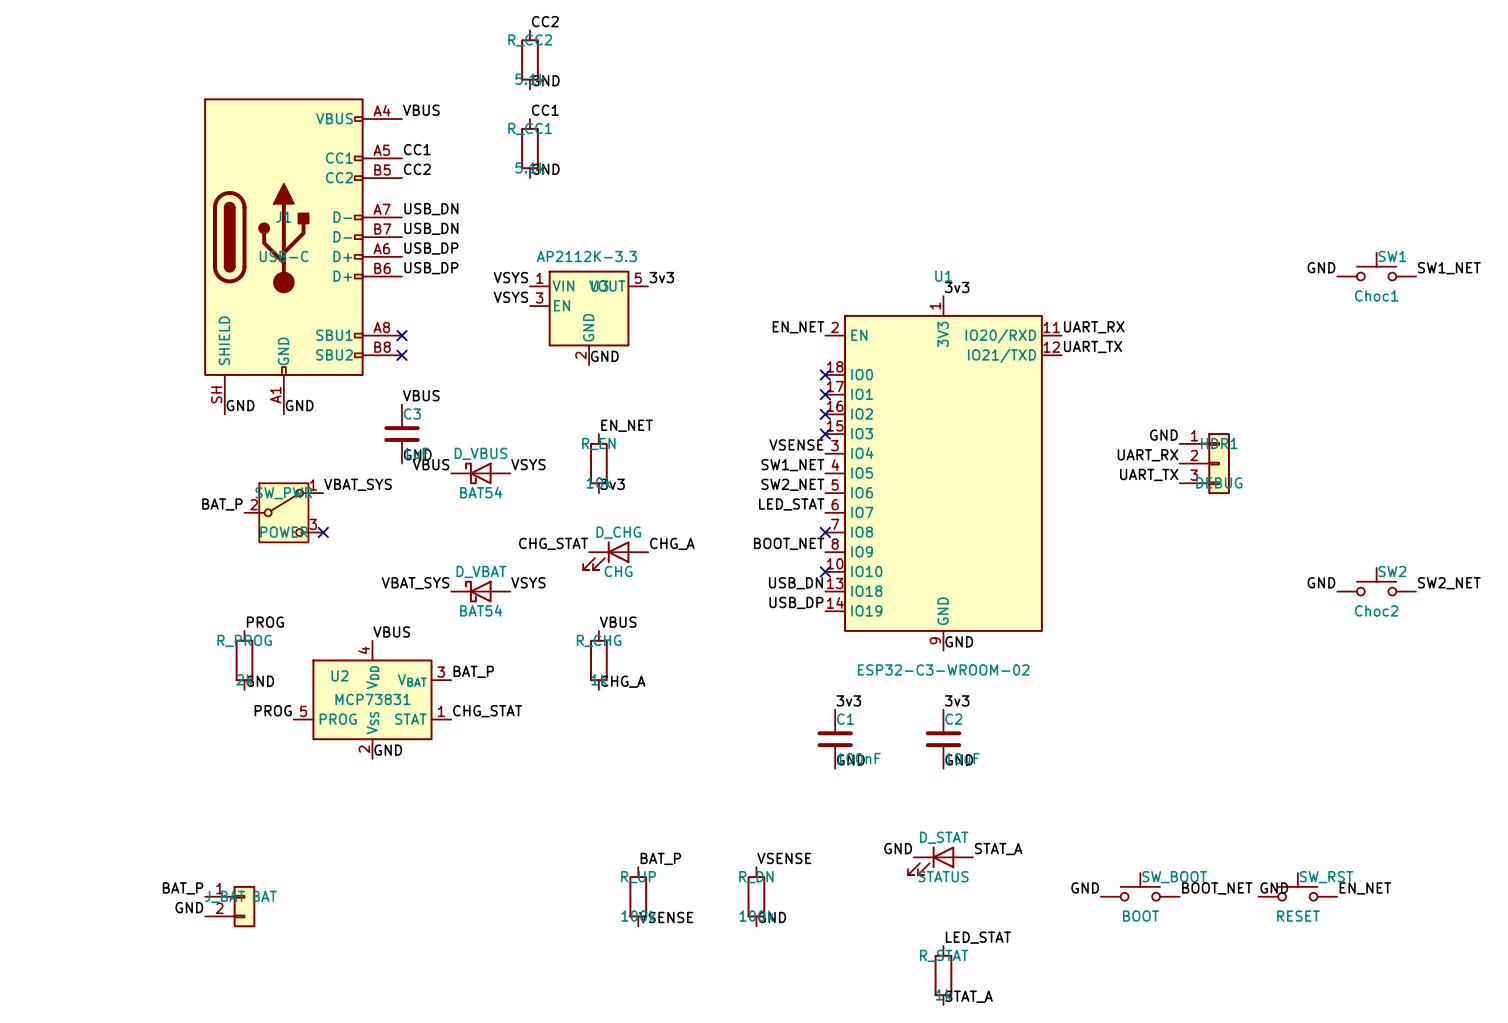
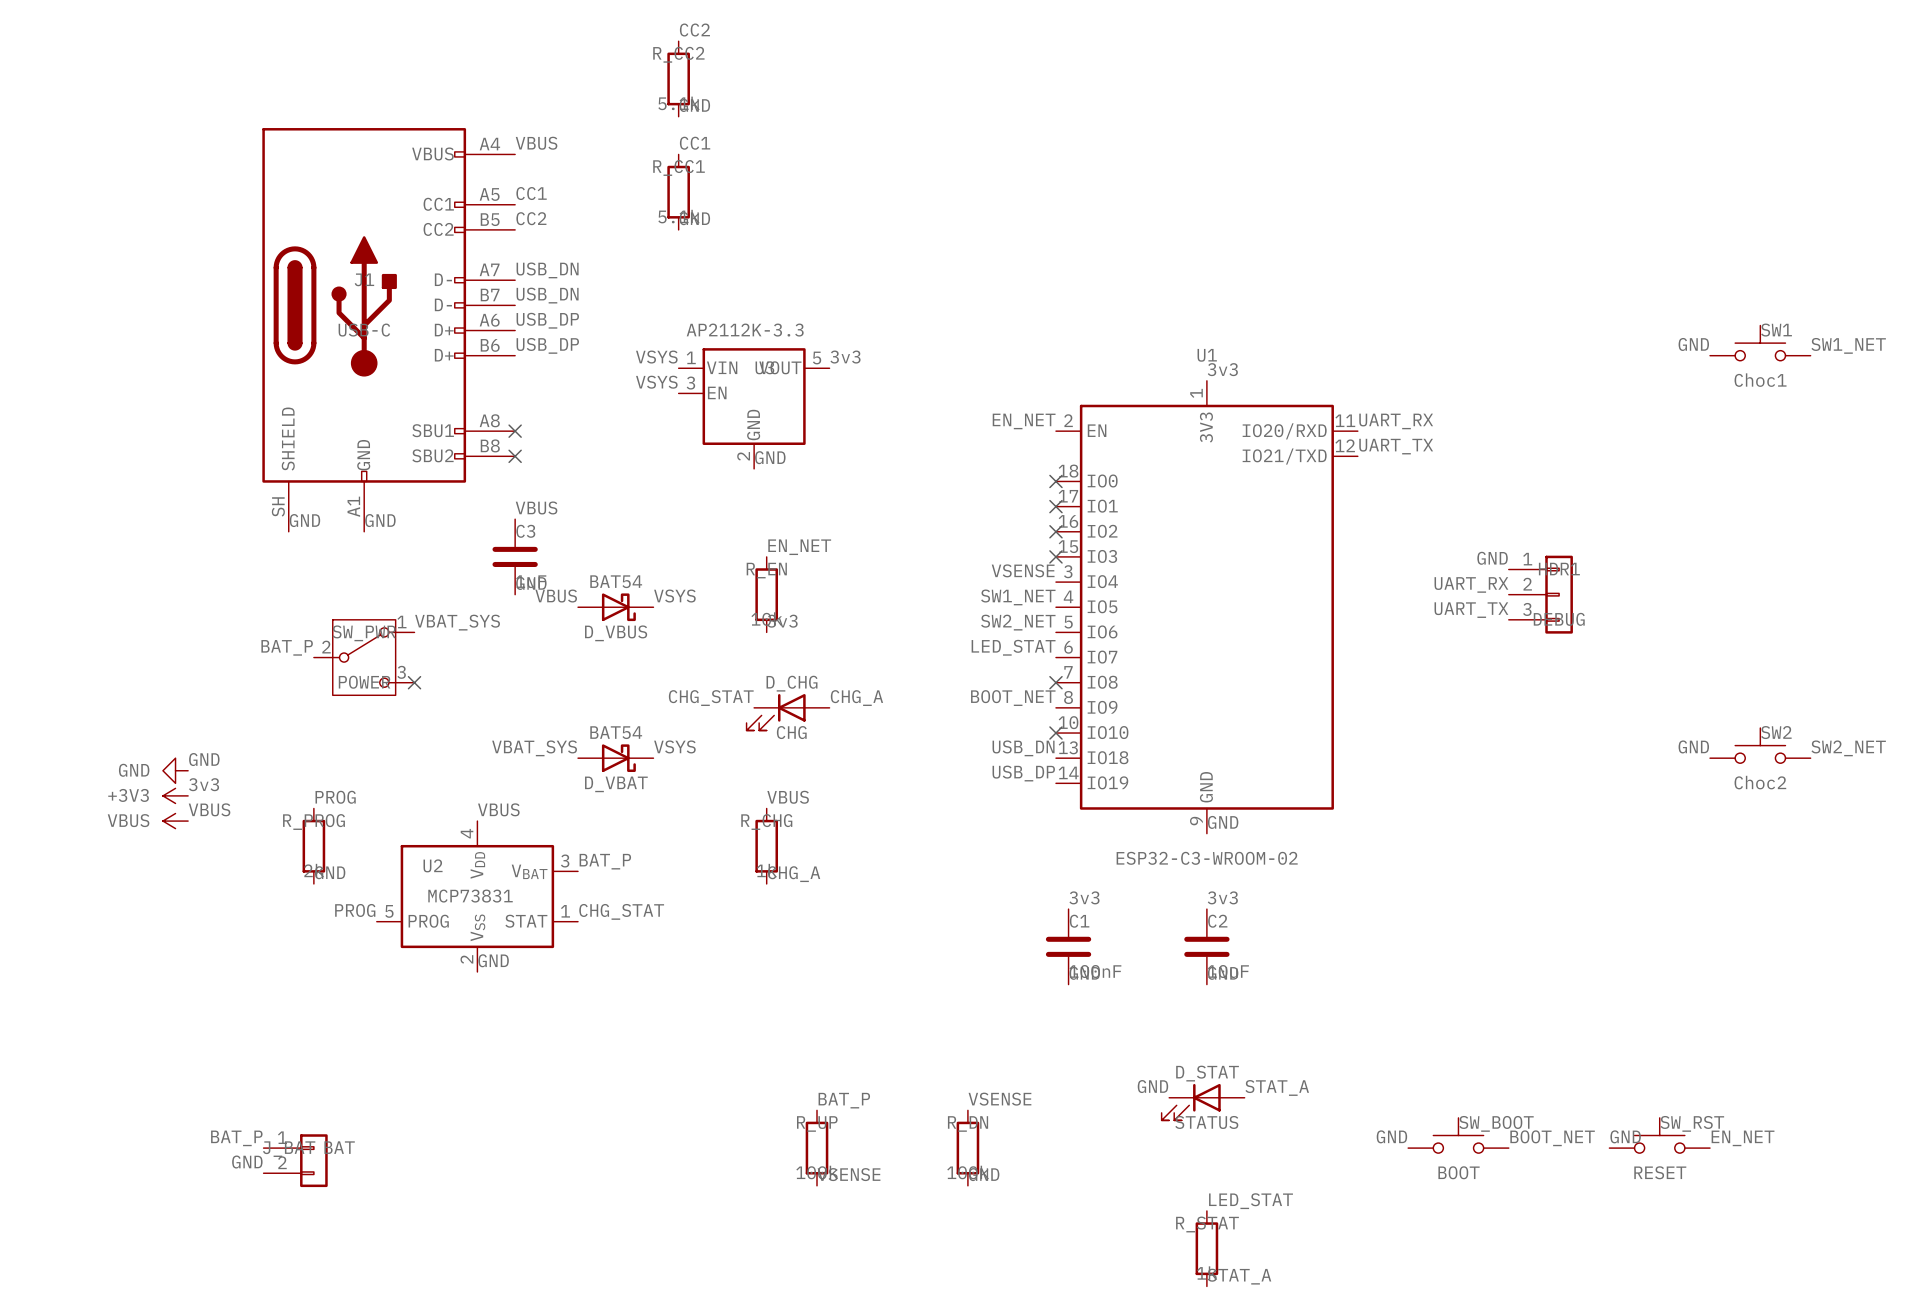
D_VBUS rotation: 0° (478, 473) -> 180° (618, 607)
D_VBAT rotation: 0° (478, 591) -> 180° (618, 758)
label: none -> GND (204, 759)
power symbol: none -> GND (175, 770)
label: none -> 3v3 (204, 784)
power symbol: none -> +3V3 (175, 795)
label: none -> VBUS (209, 809)
power symbol: none -> VBUS (175, 821)

